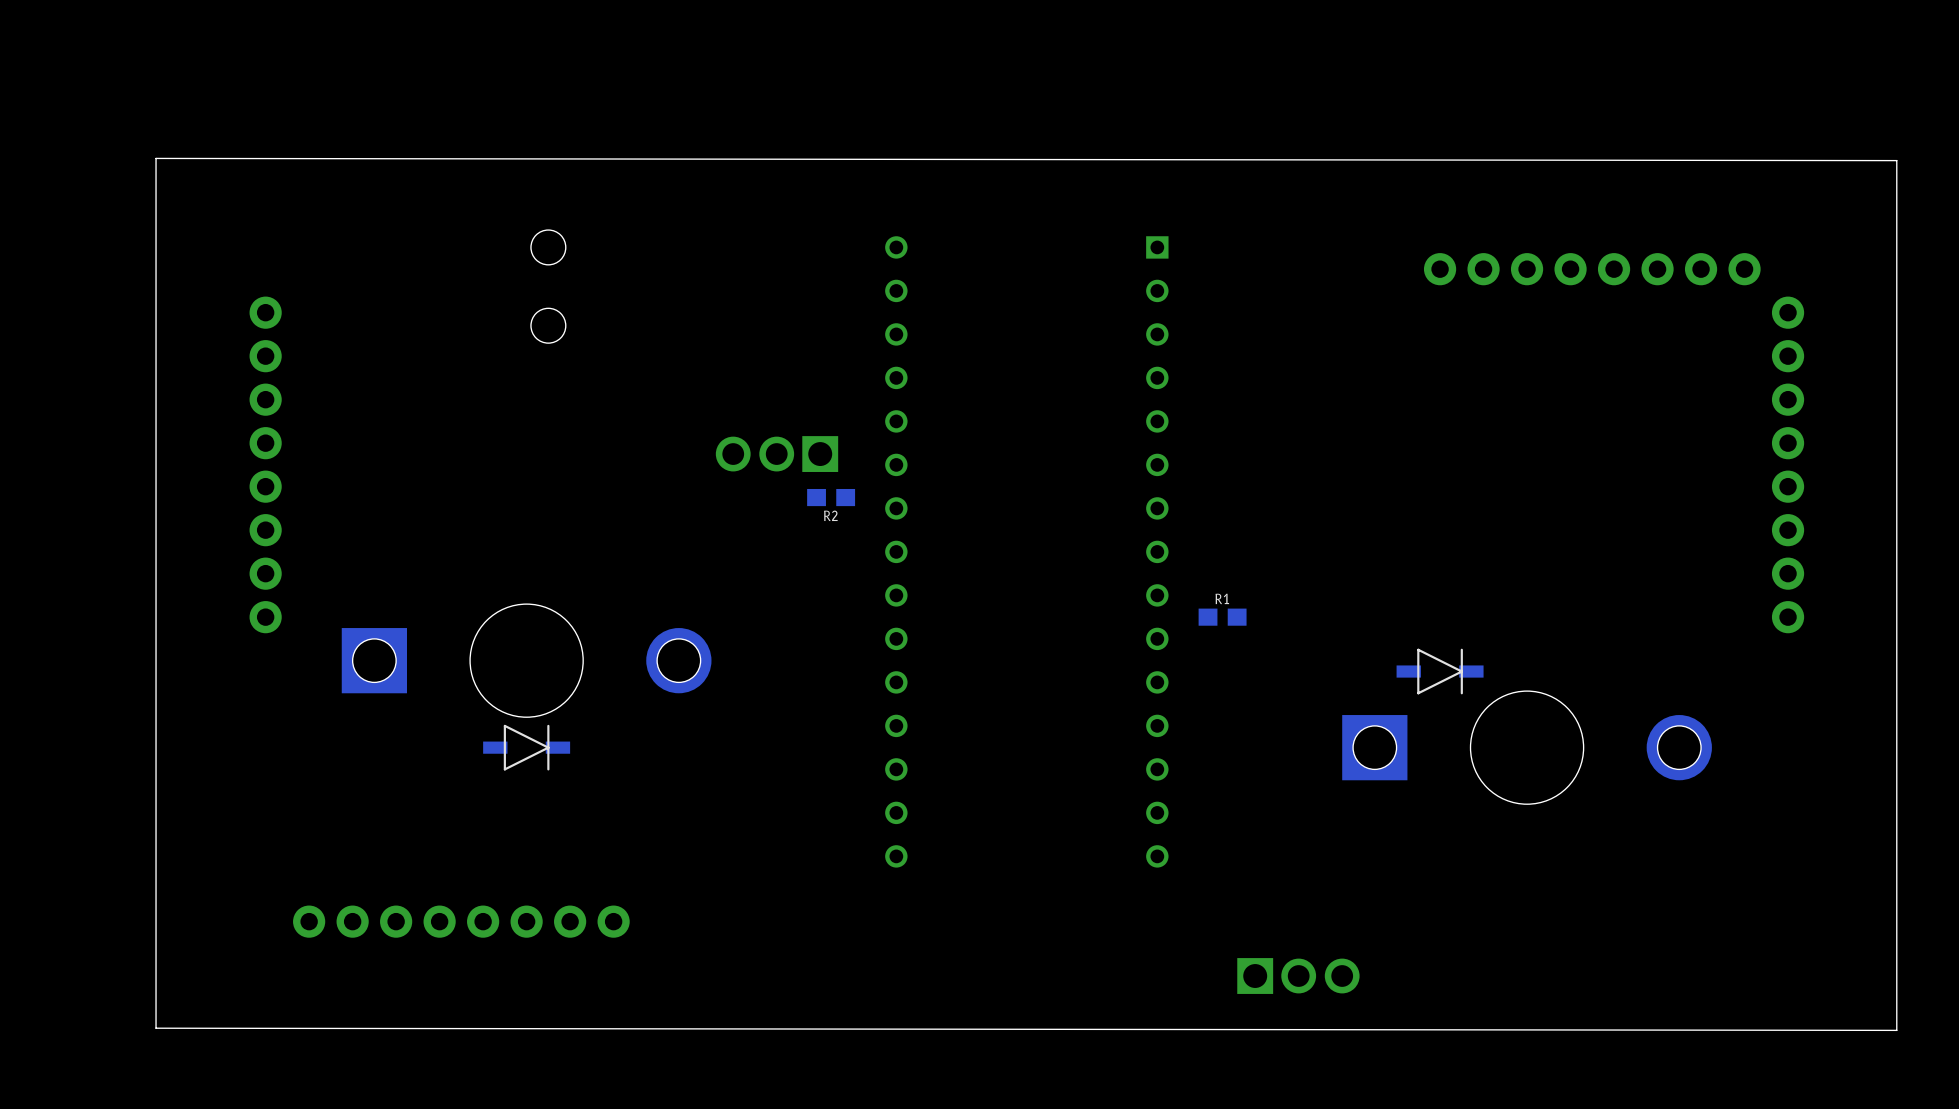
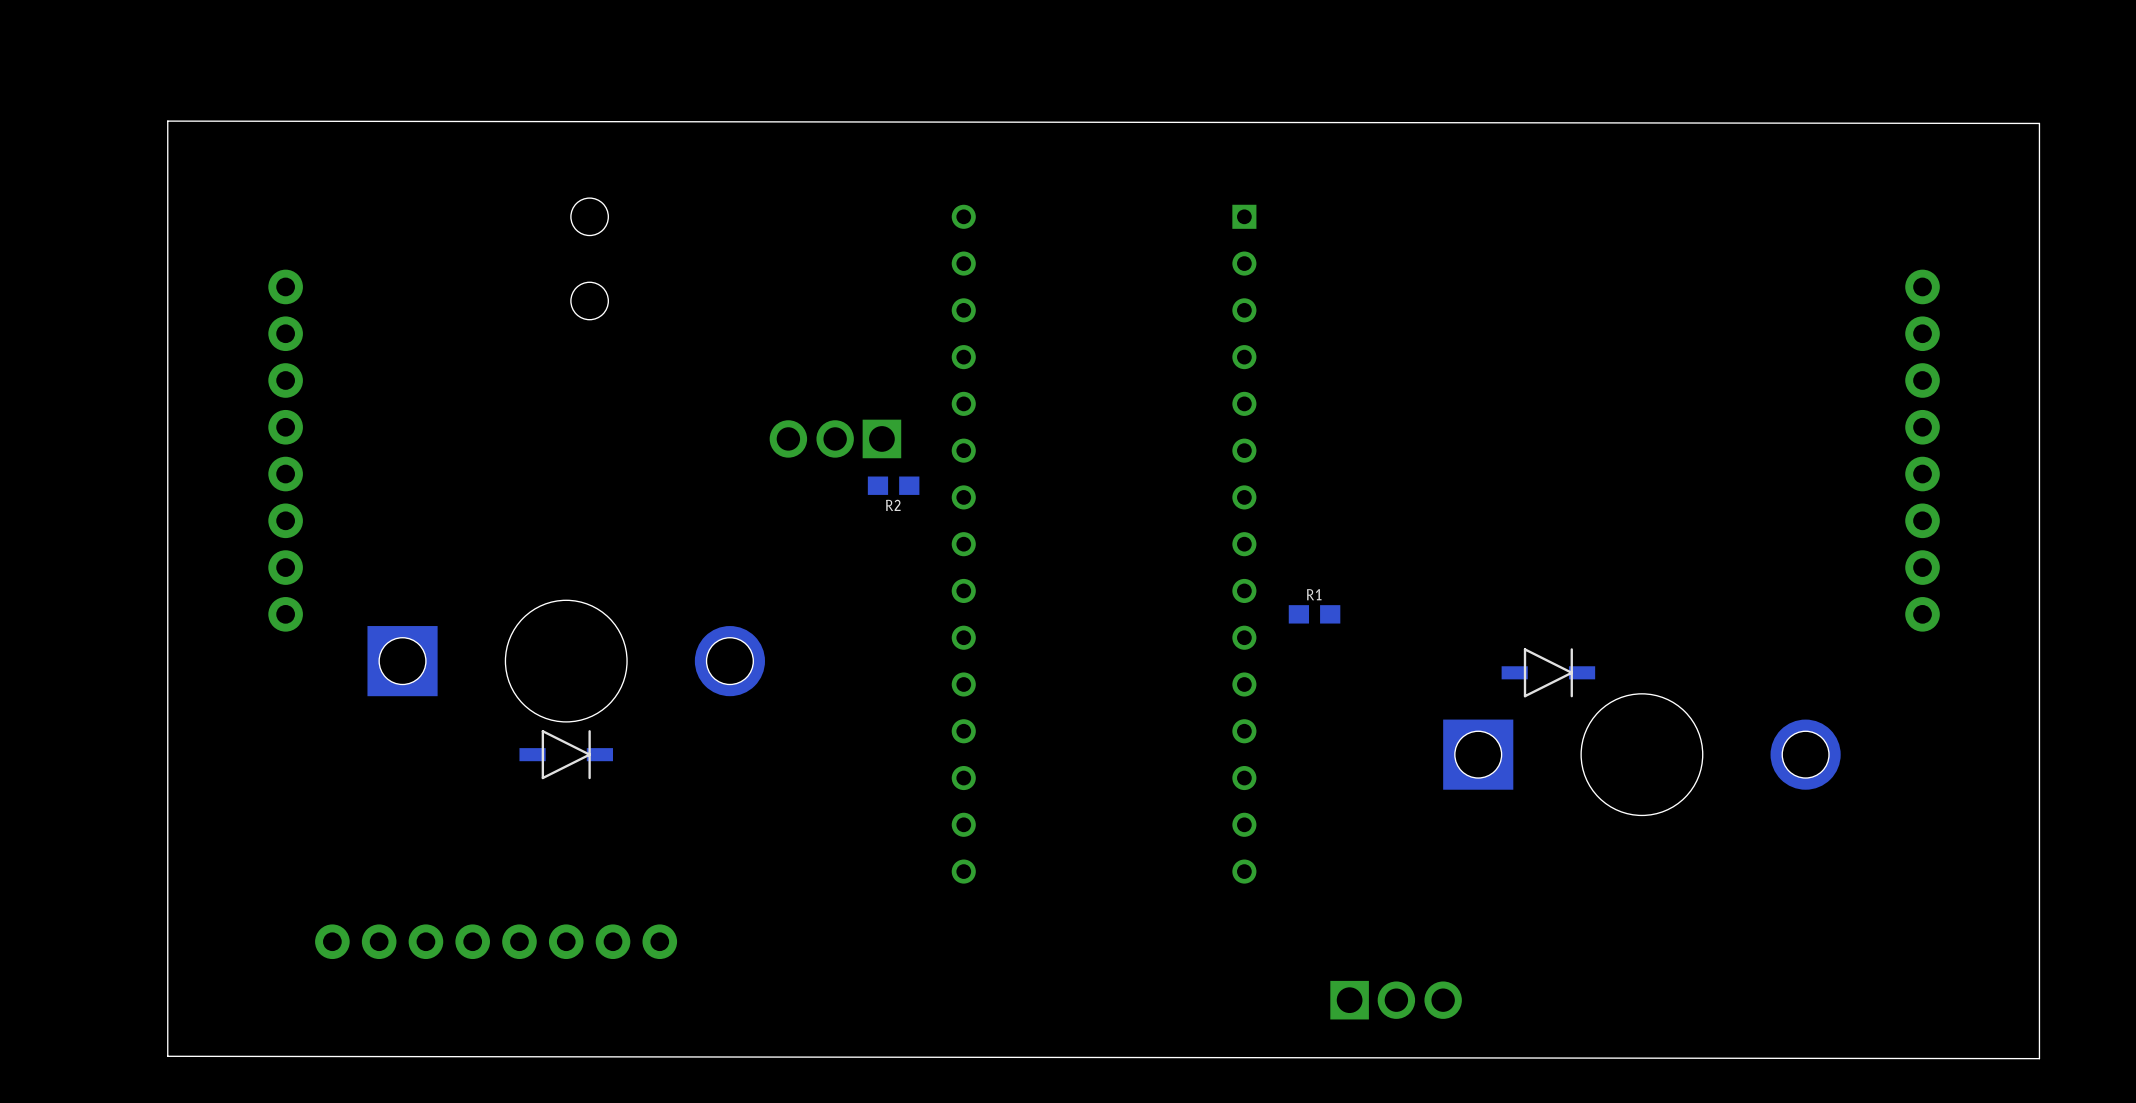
part: (1592, 269) -> none

